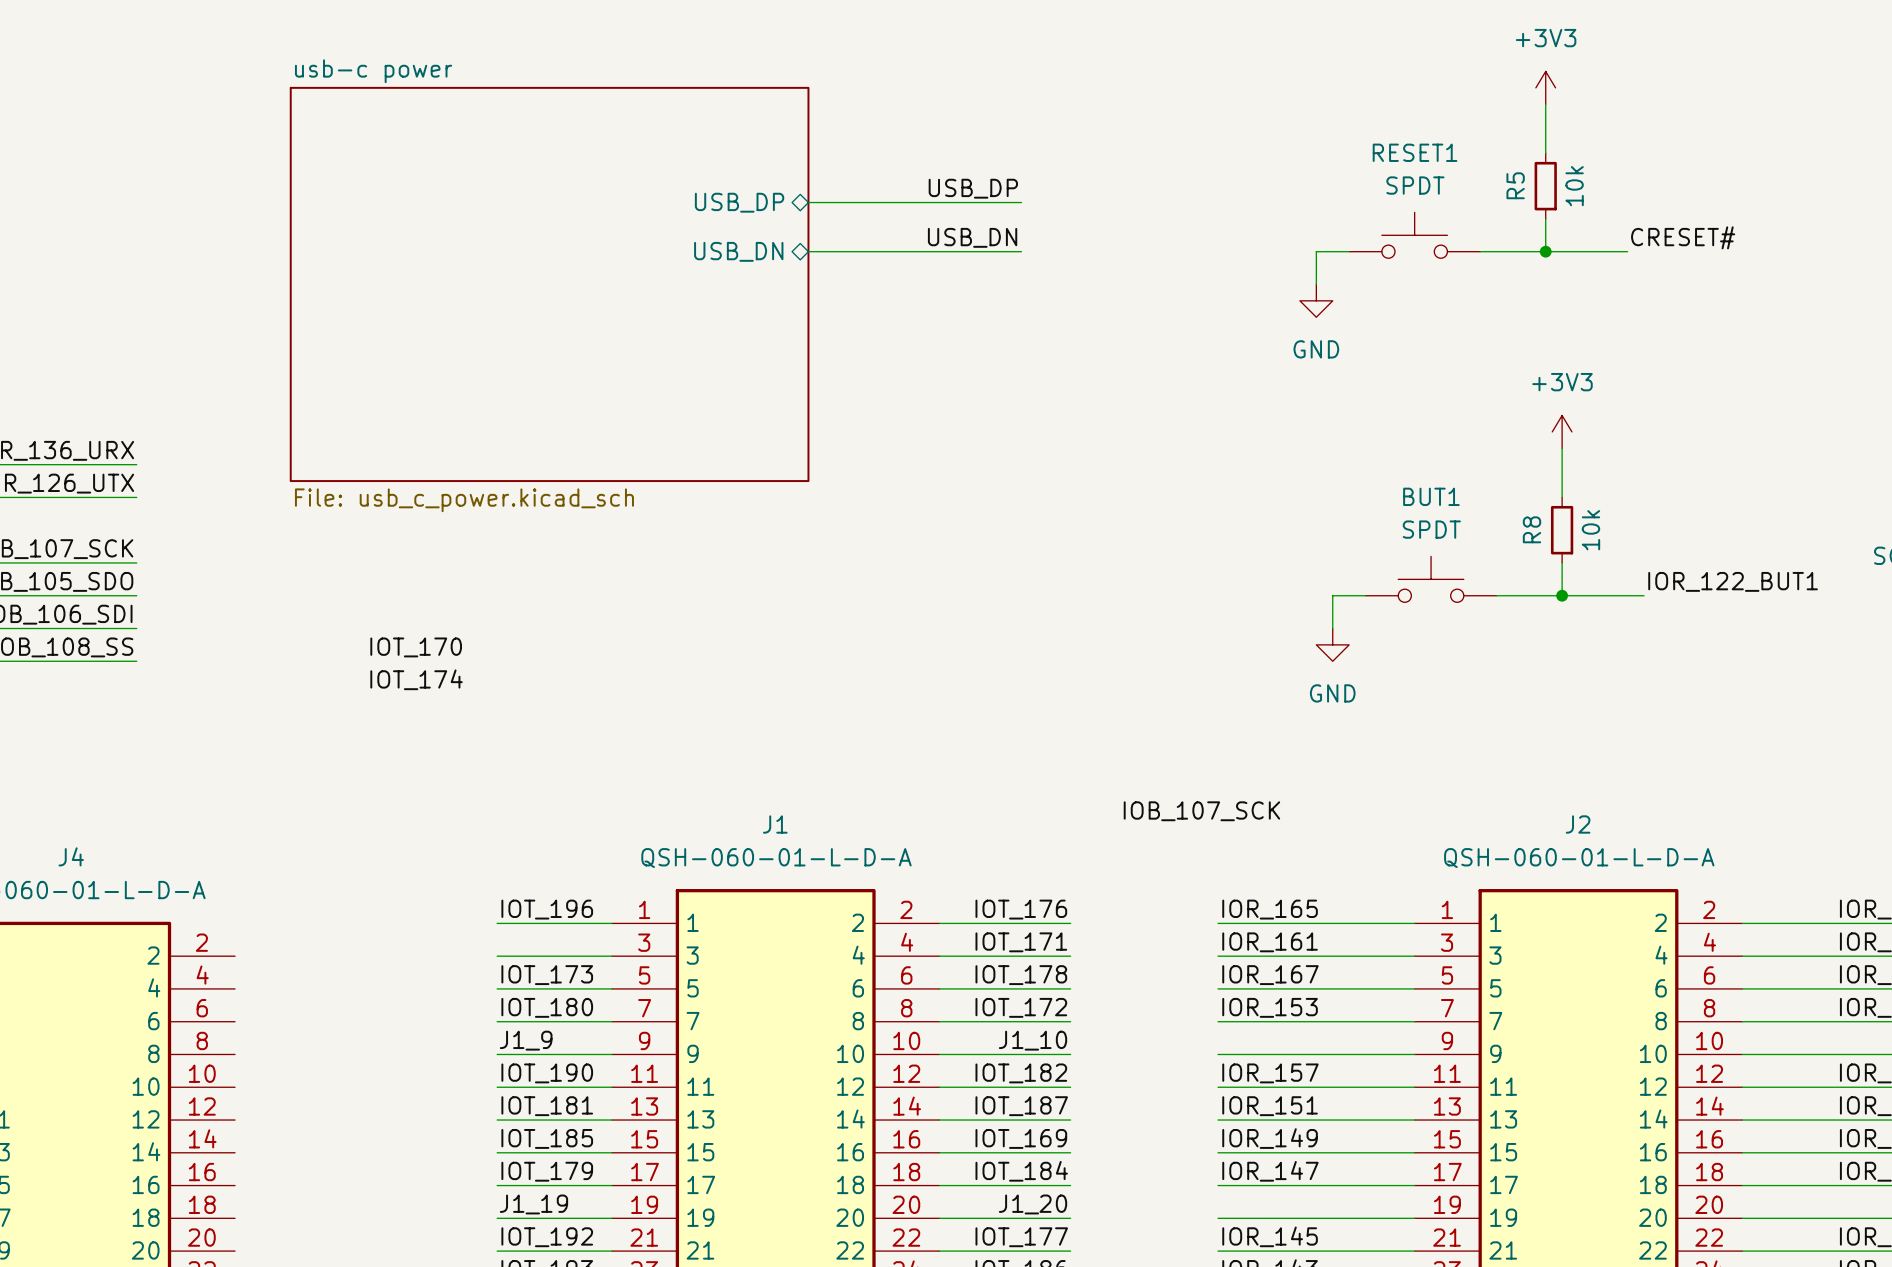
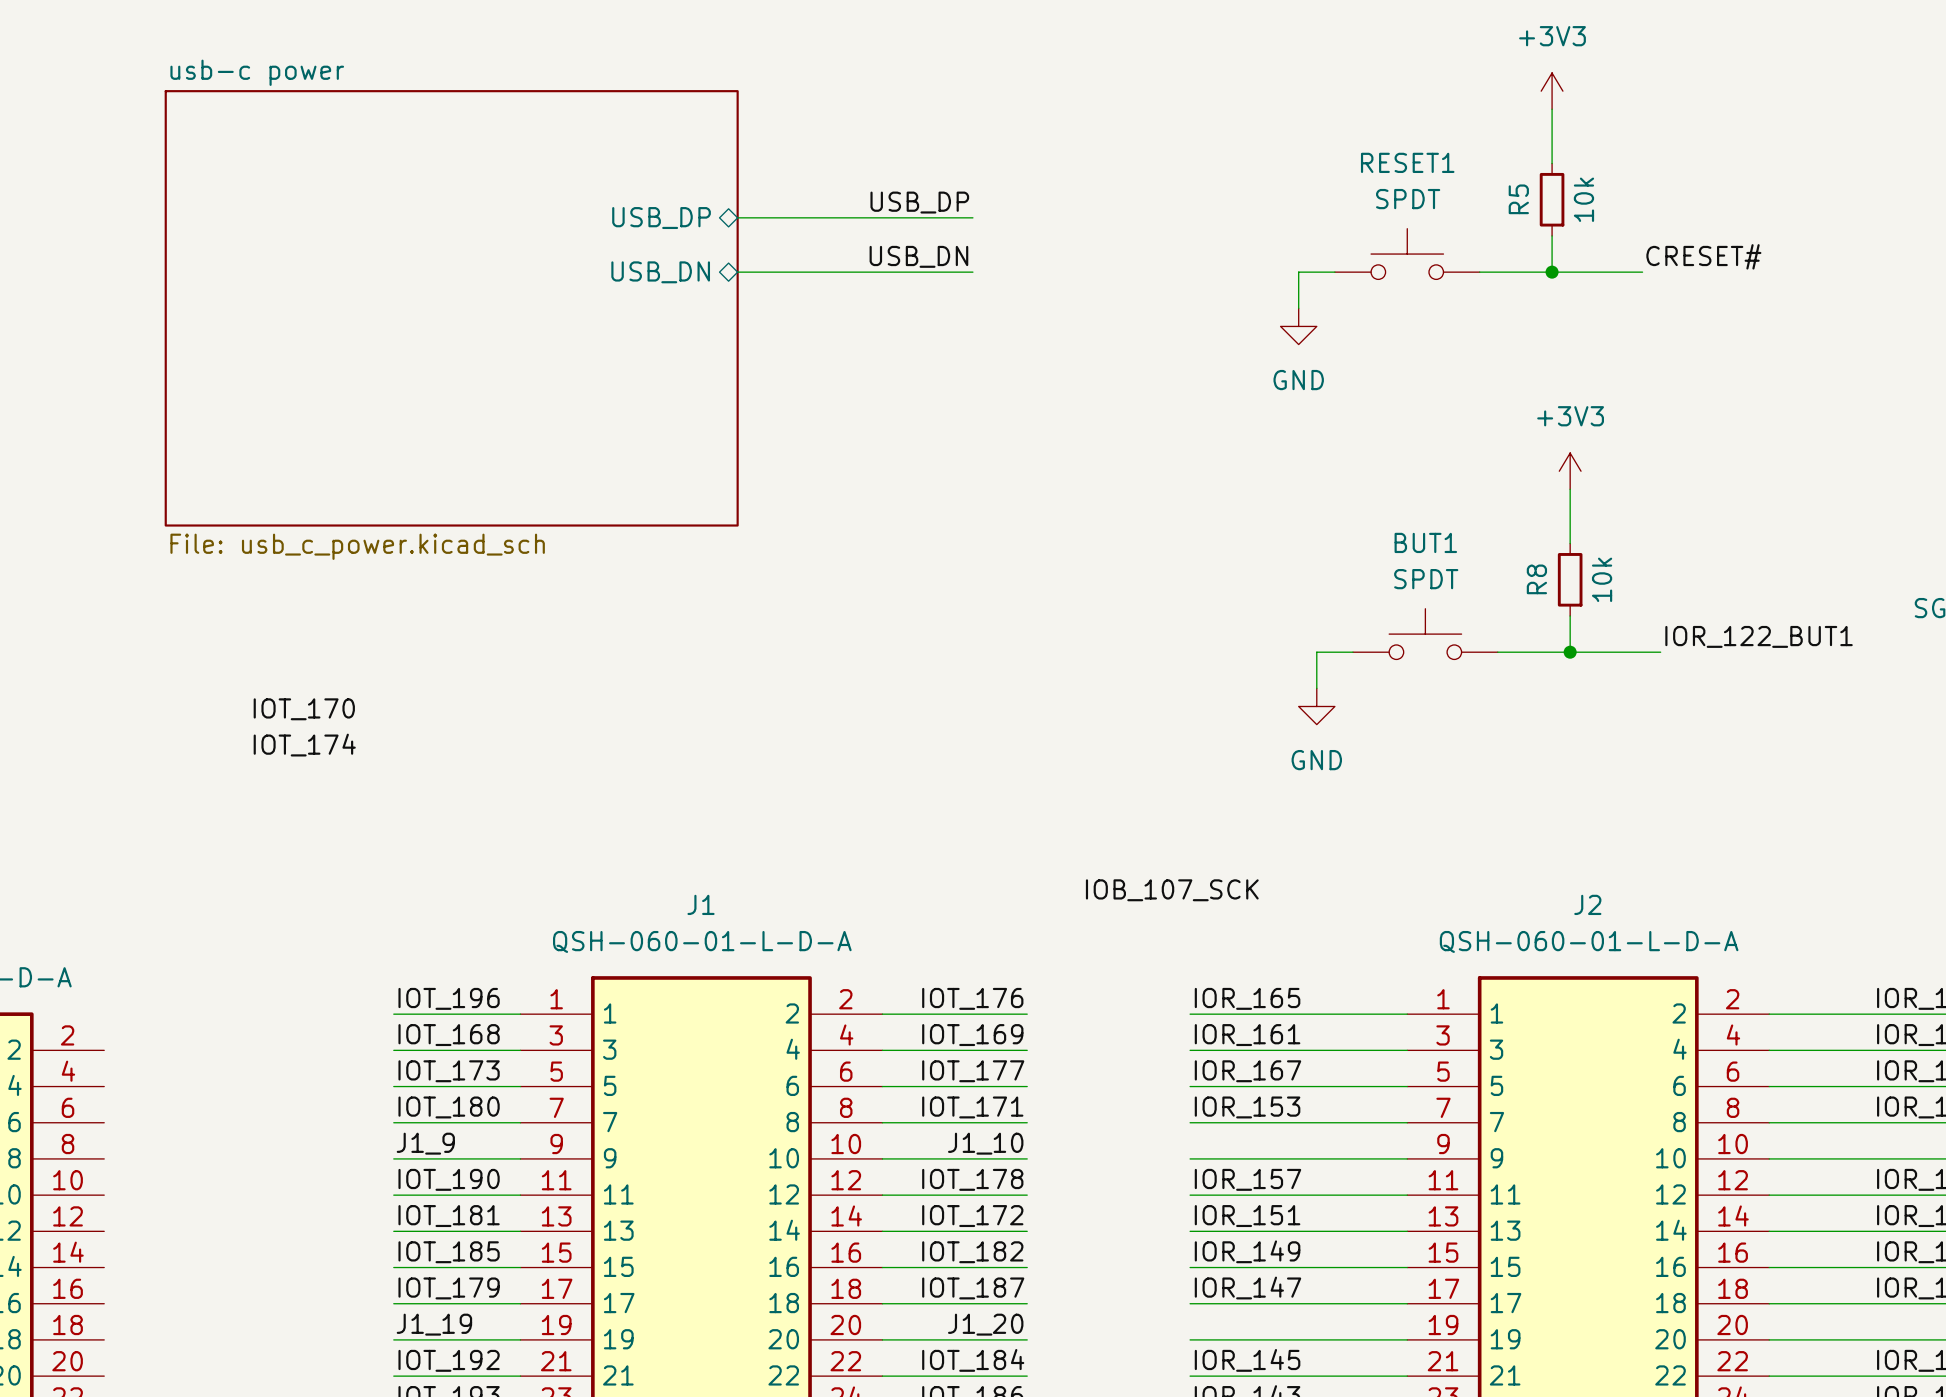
label: none -> IOT_168 (449, 1035)
label: IOT_171 (1021, 942) -> IOT_169 (972, 1035)
label: IOT_178 (1021, 975) -> IOT_177 (973, 1071)
label: IOT_172 (1021, 1007) -> IOT_171 (972, 1107)
label: IOT_182 (1021, 1073) -> IOT_178 (972, 1179)
label: IOT_187 (1021, 1106) -> IOT_172 (972, 1216)
label: IOT_169 (1021, 1138) -> IOT_182 (972, 1252)
label: IOT_184 (1021, 1171) -> IOT_187 (973, 1288)
label: IOT_177 (1021, 1237) -> IOT_184 (973, 1360)

